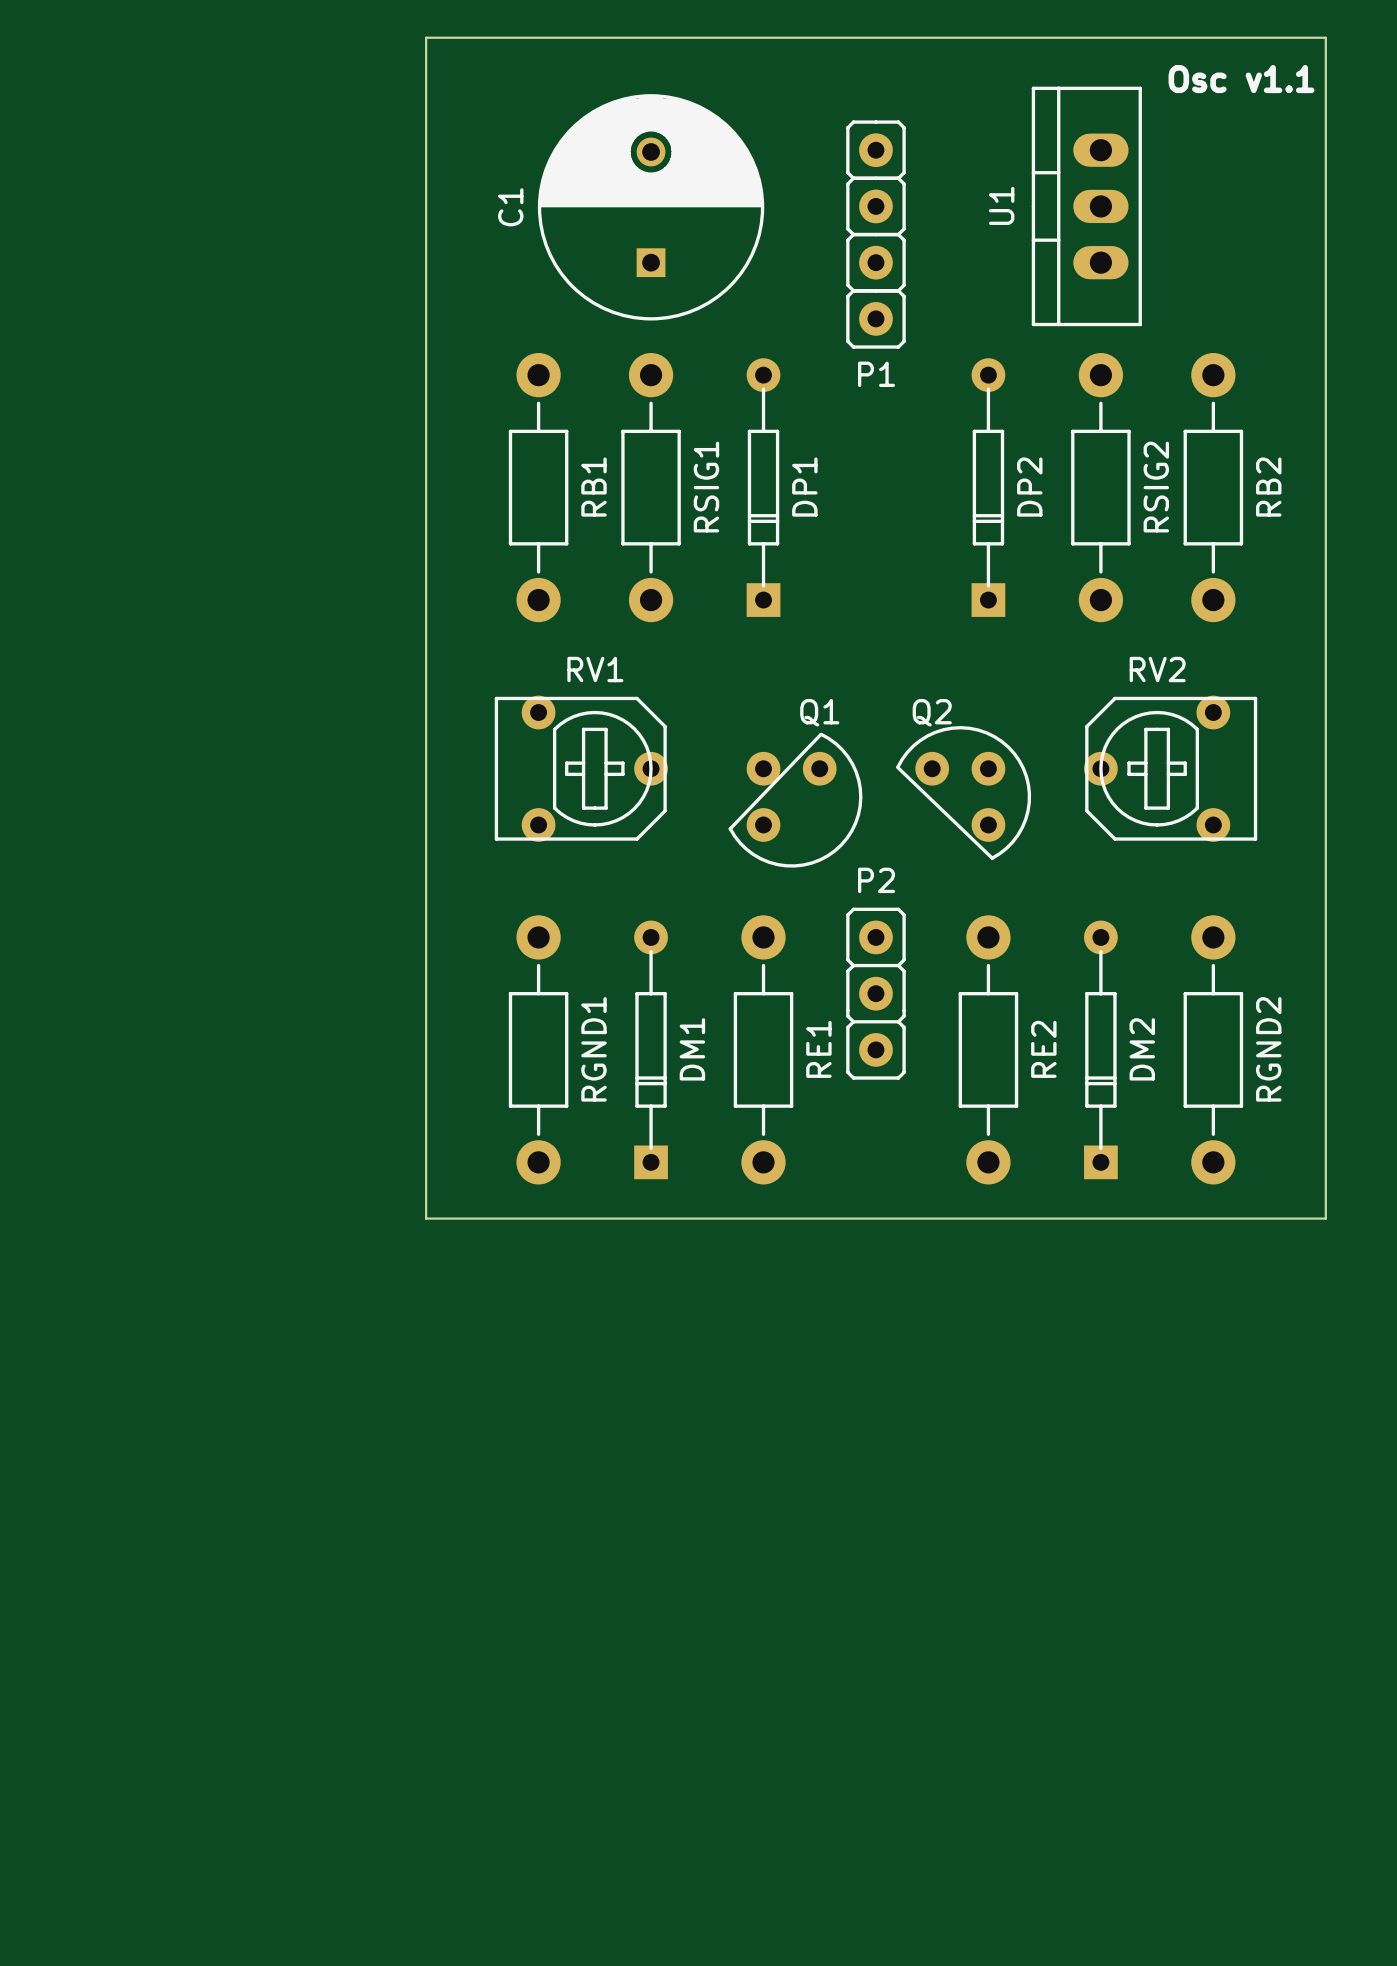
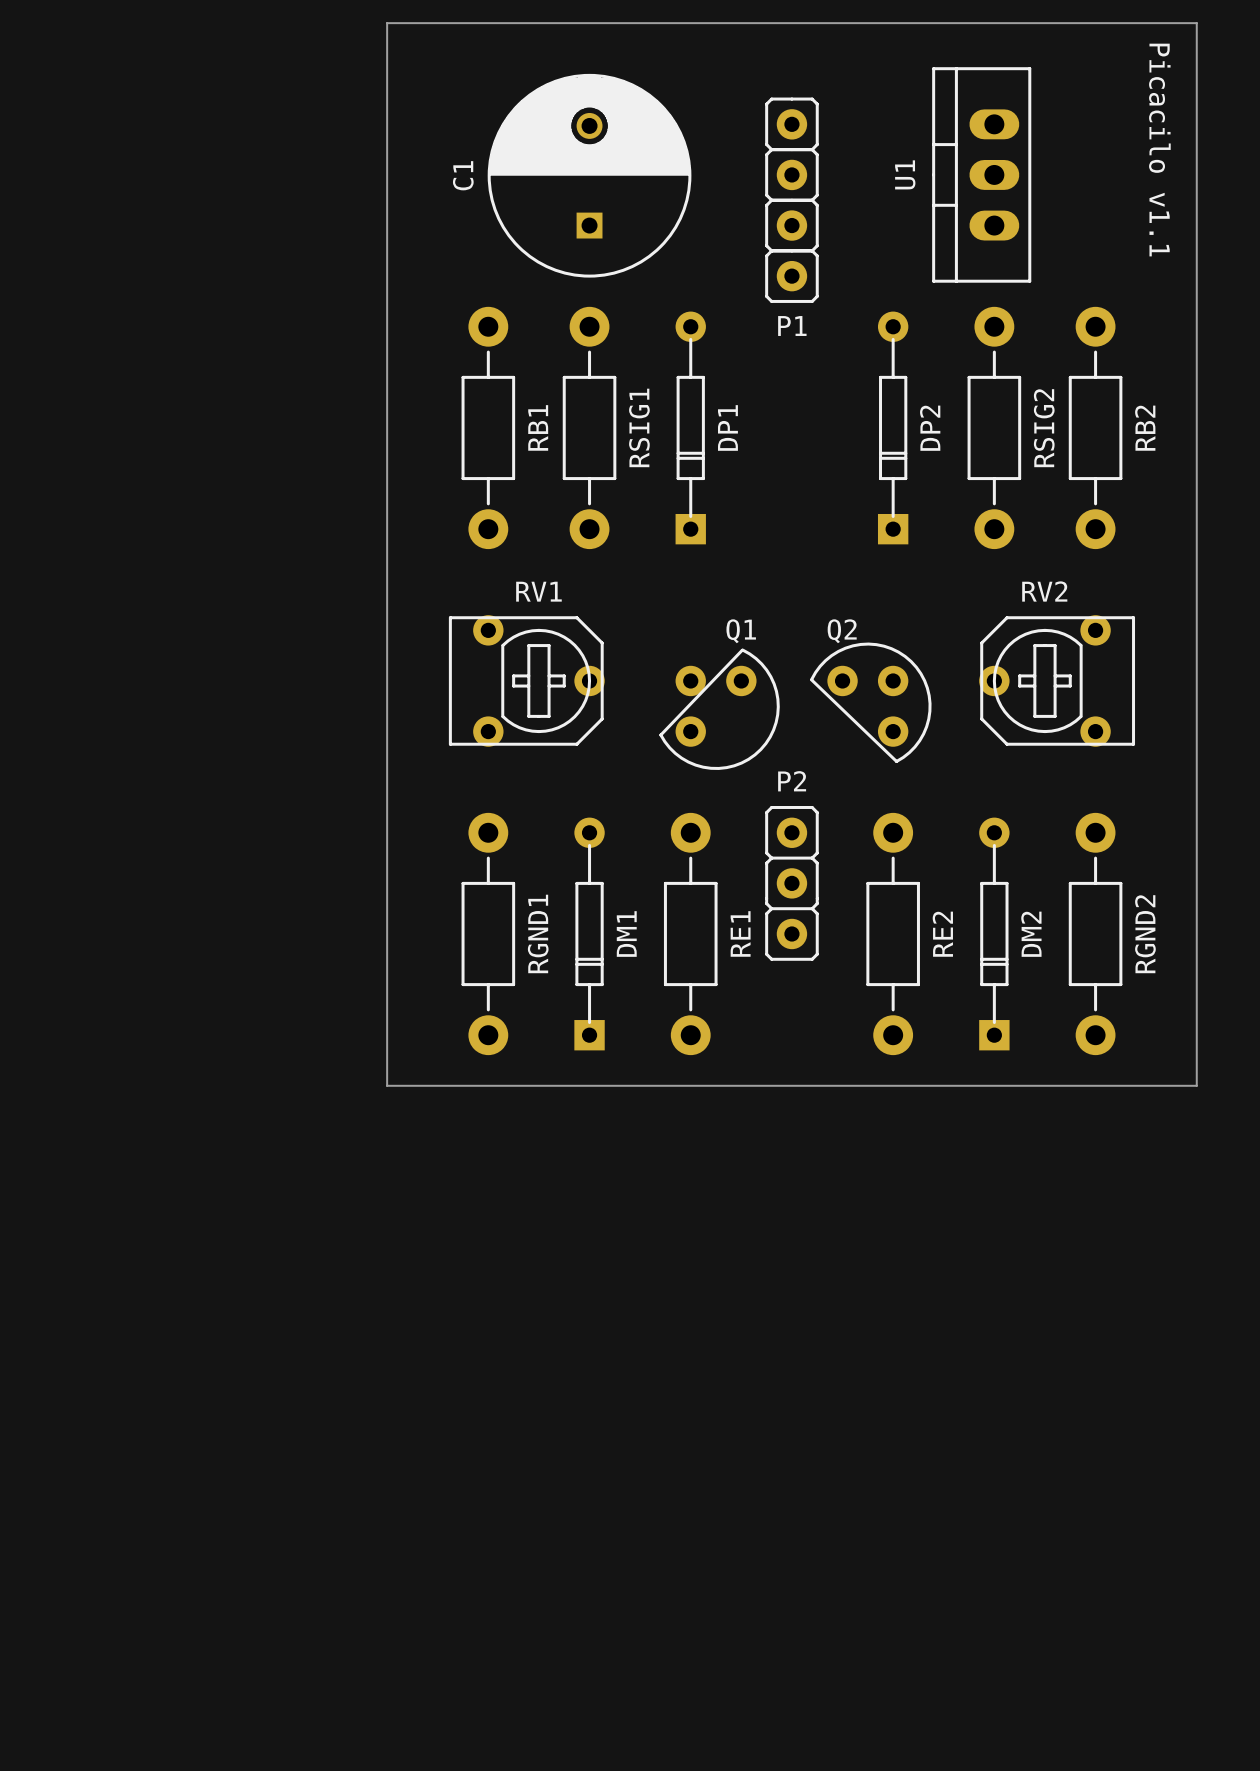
text: Osc v1.1 (1241, 79) -> none
text: none -> Picacilo v1.1 (1159, 150)

